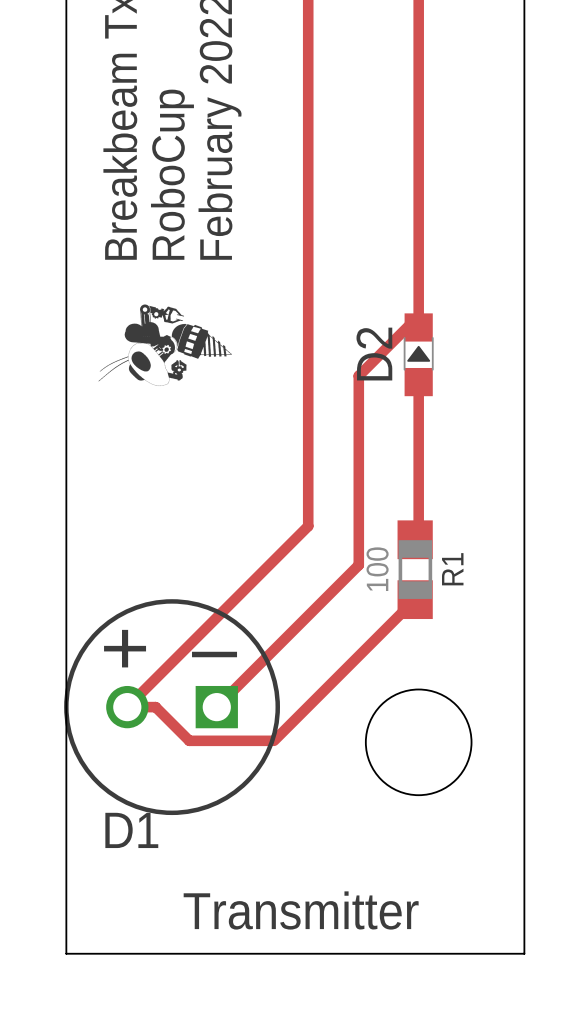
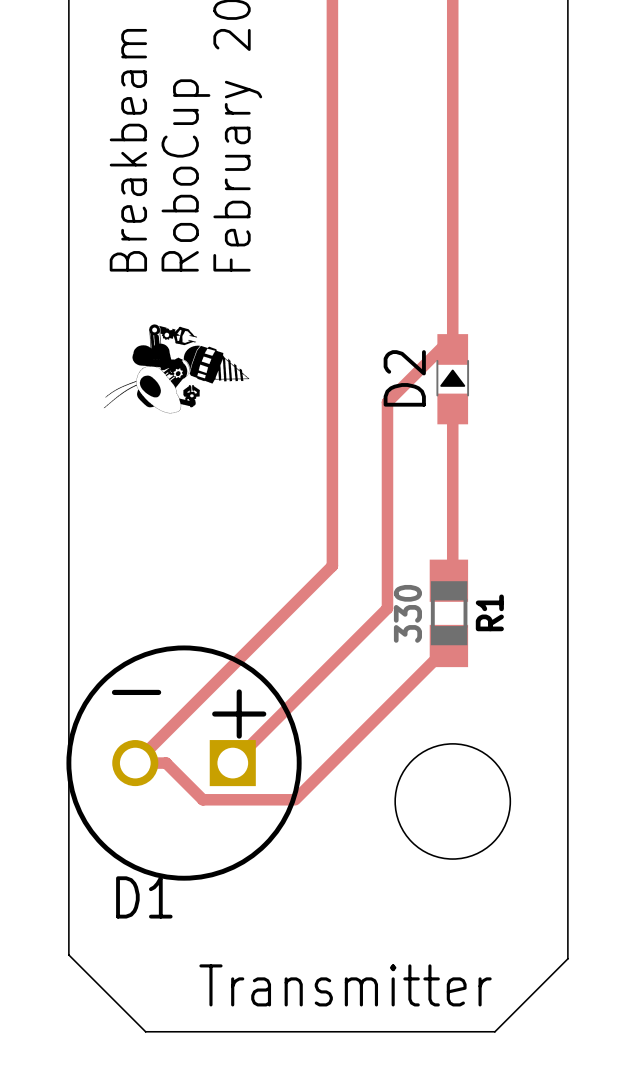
R1 value: 100 (377, 569) -> 330 (407, 613)
text position: + (125, 648) -> + (239, 714)
text position: _ (214, 654) -> _ (136, 692)
board edge: (66, 883) (66, 953) (136, 953) -> (68, 955) (145, 1031)
board edge: (524, 886) (524, 953) (457, 953) -> (567, 958) (494, 1031)

